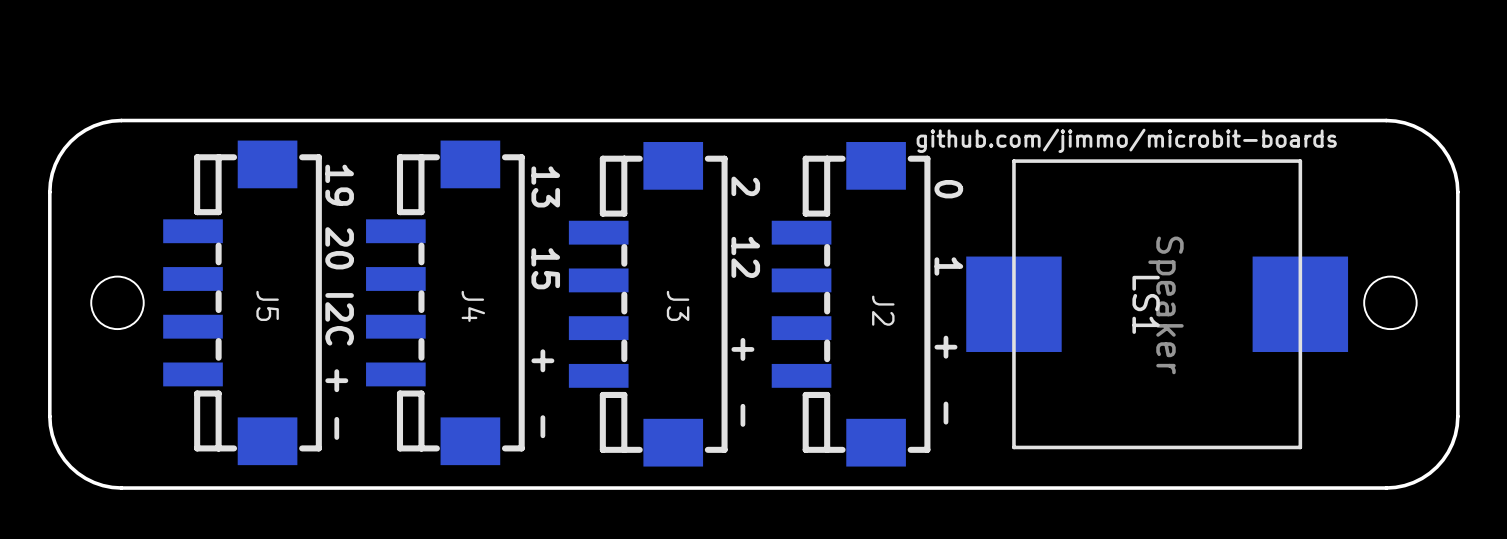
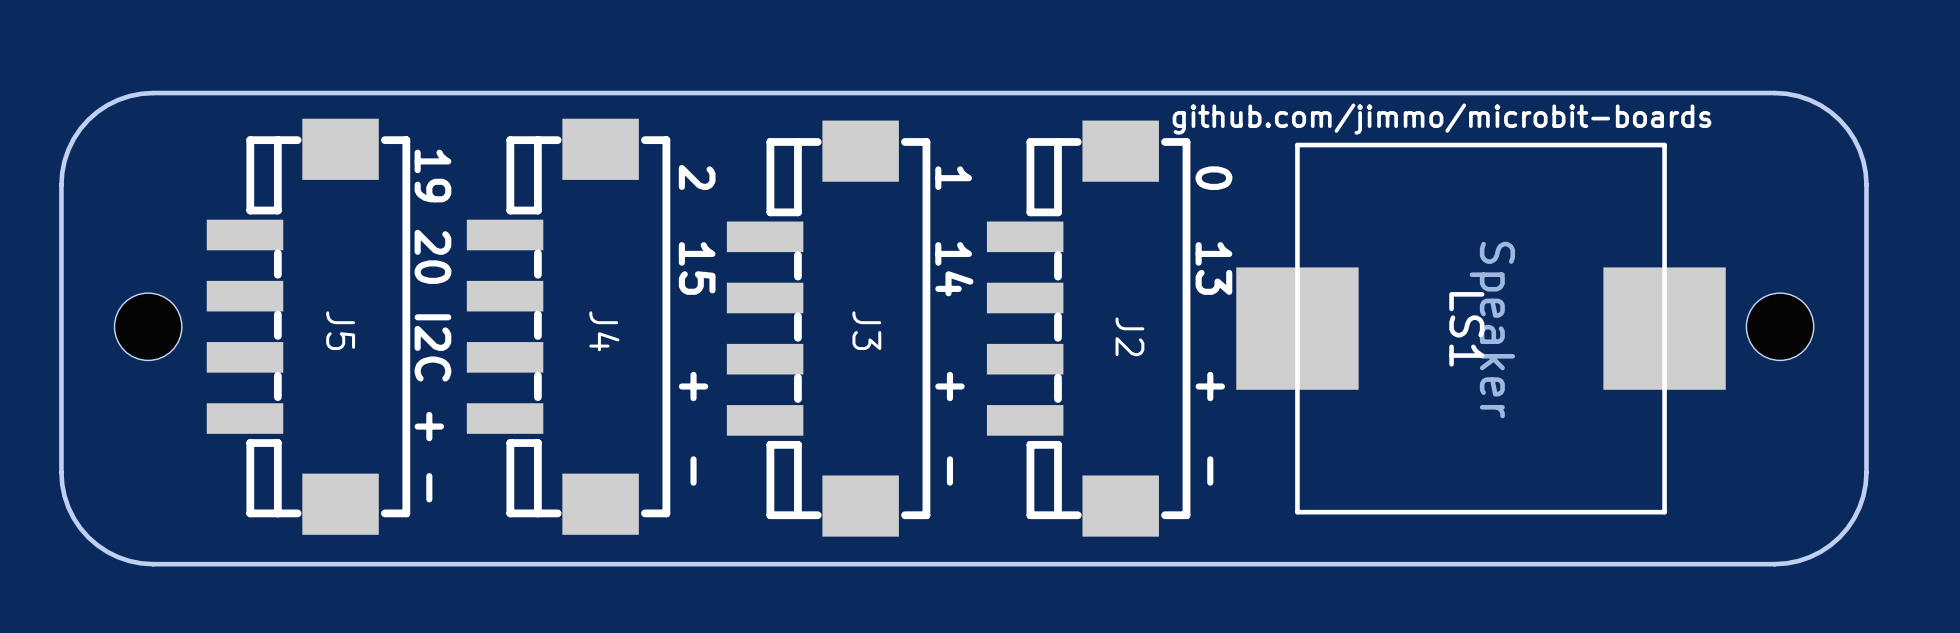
text: 2 12 + - (745, 301) -> 1 14 + - (954, 326)
text: 13 15 + - (545, 302) -> 2 15 + - (697, 325)
text: 0 1 + - (948, 302) -> 0 13 + - (1213, 326)

